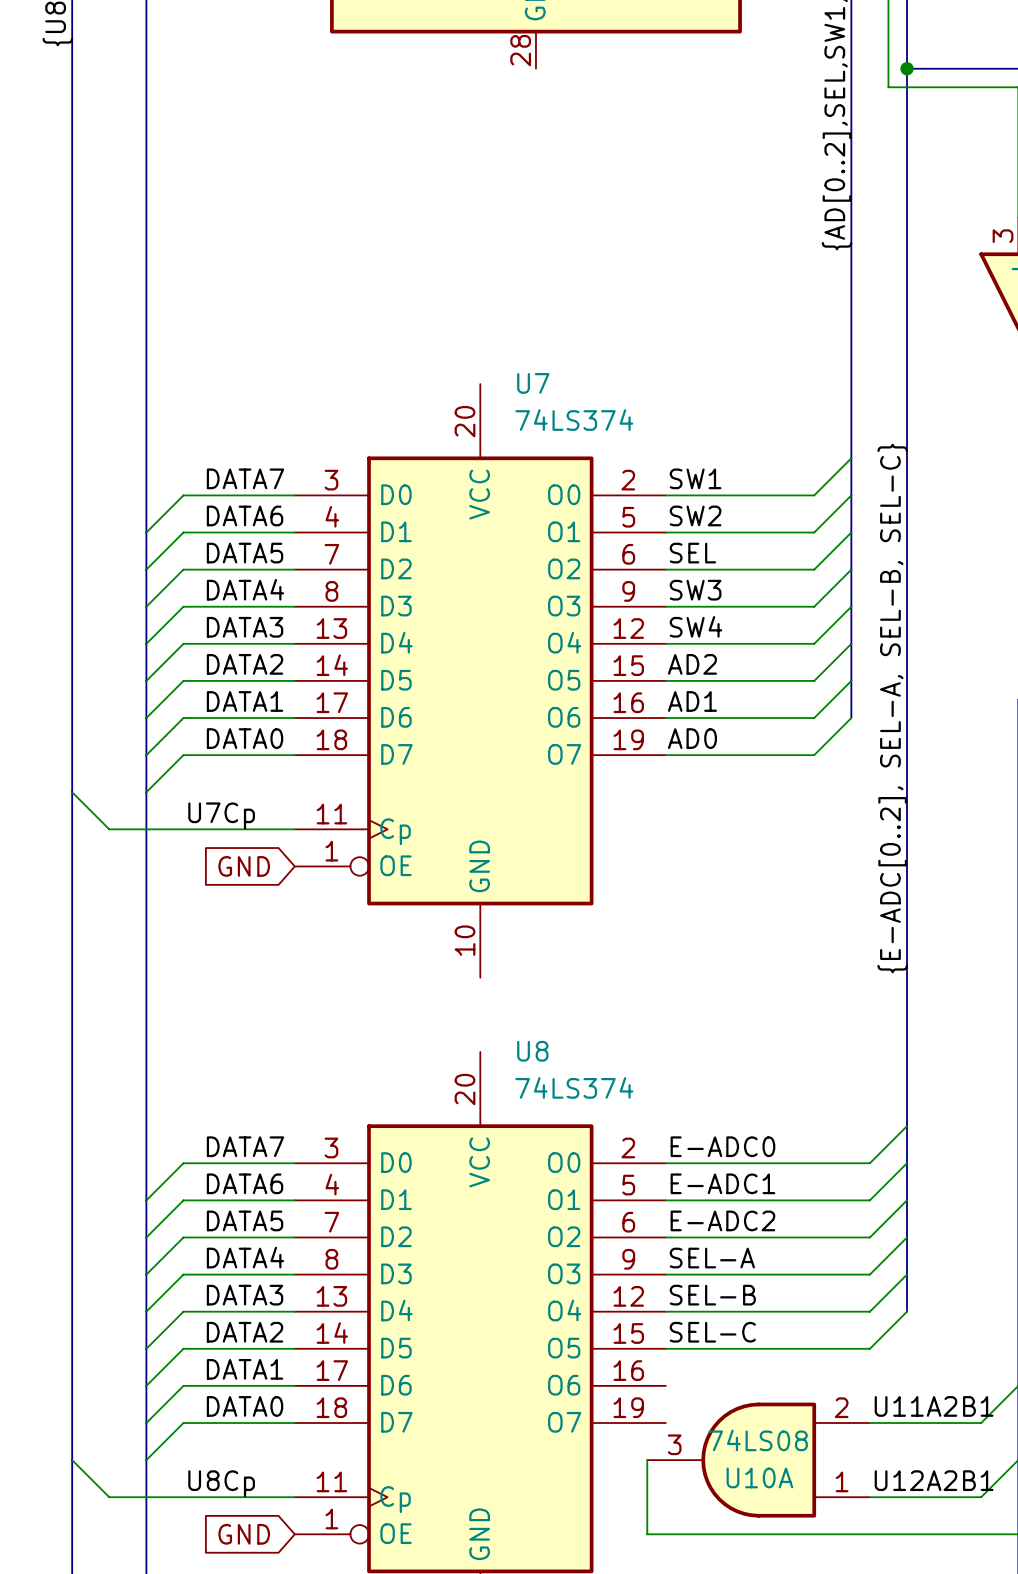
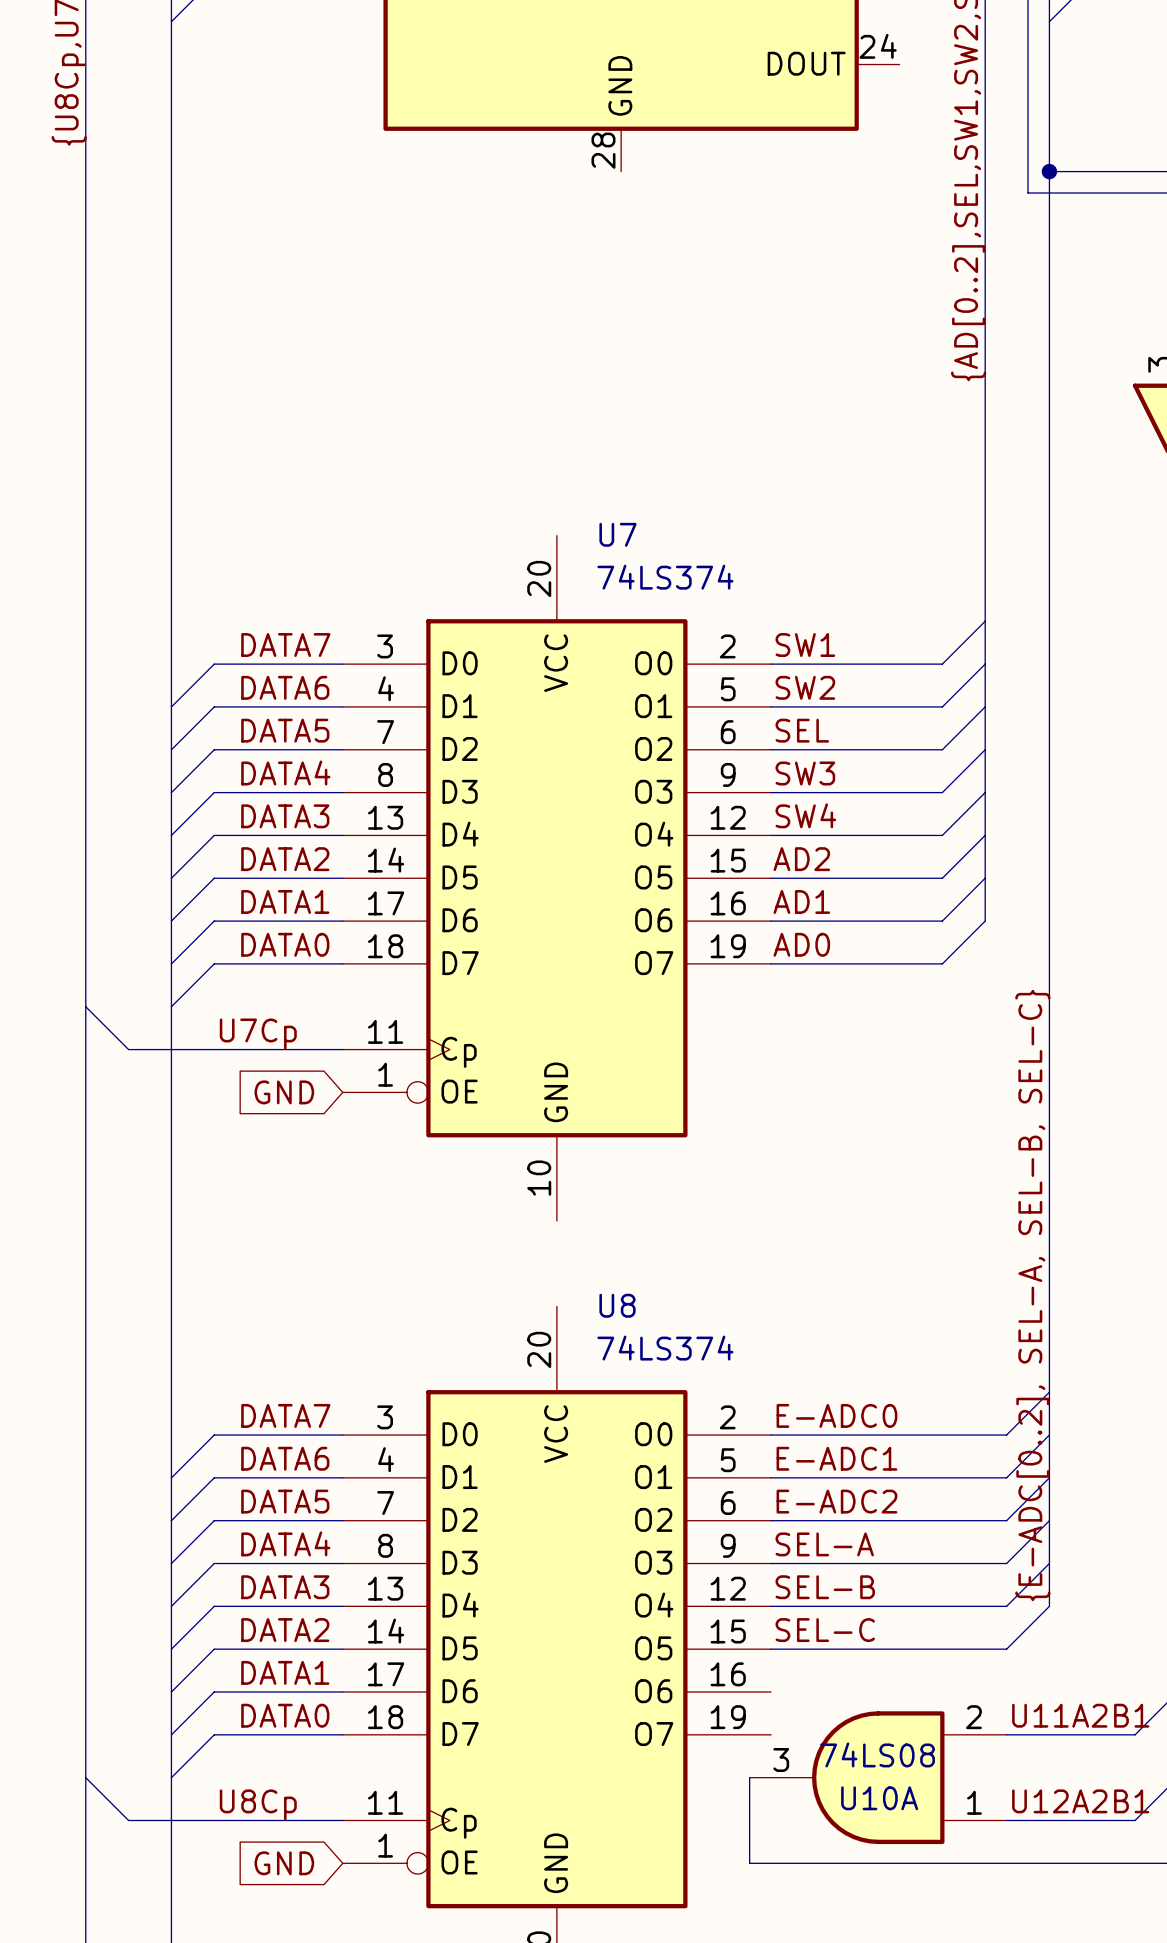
label position: {E-ADC[0..2], SEL-A, SEL-B, SEL-C} (892, 708) -> {E-ADC[0..2], SEL-A, SEL-B, SEL-C} (1032, 1295)

